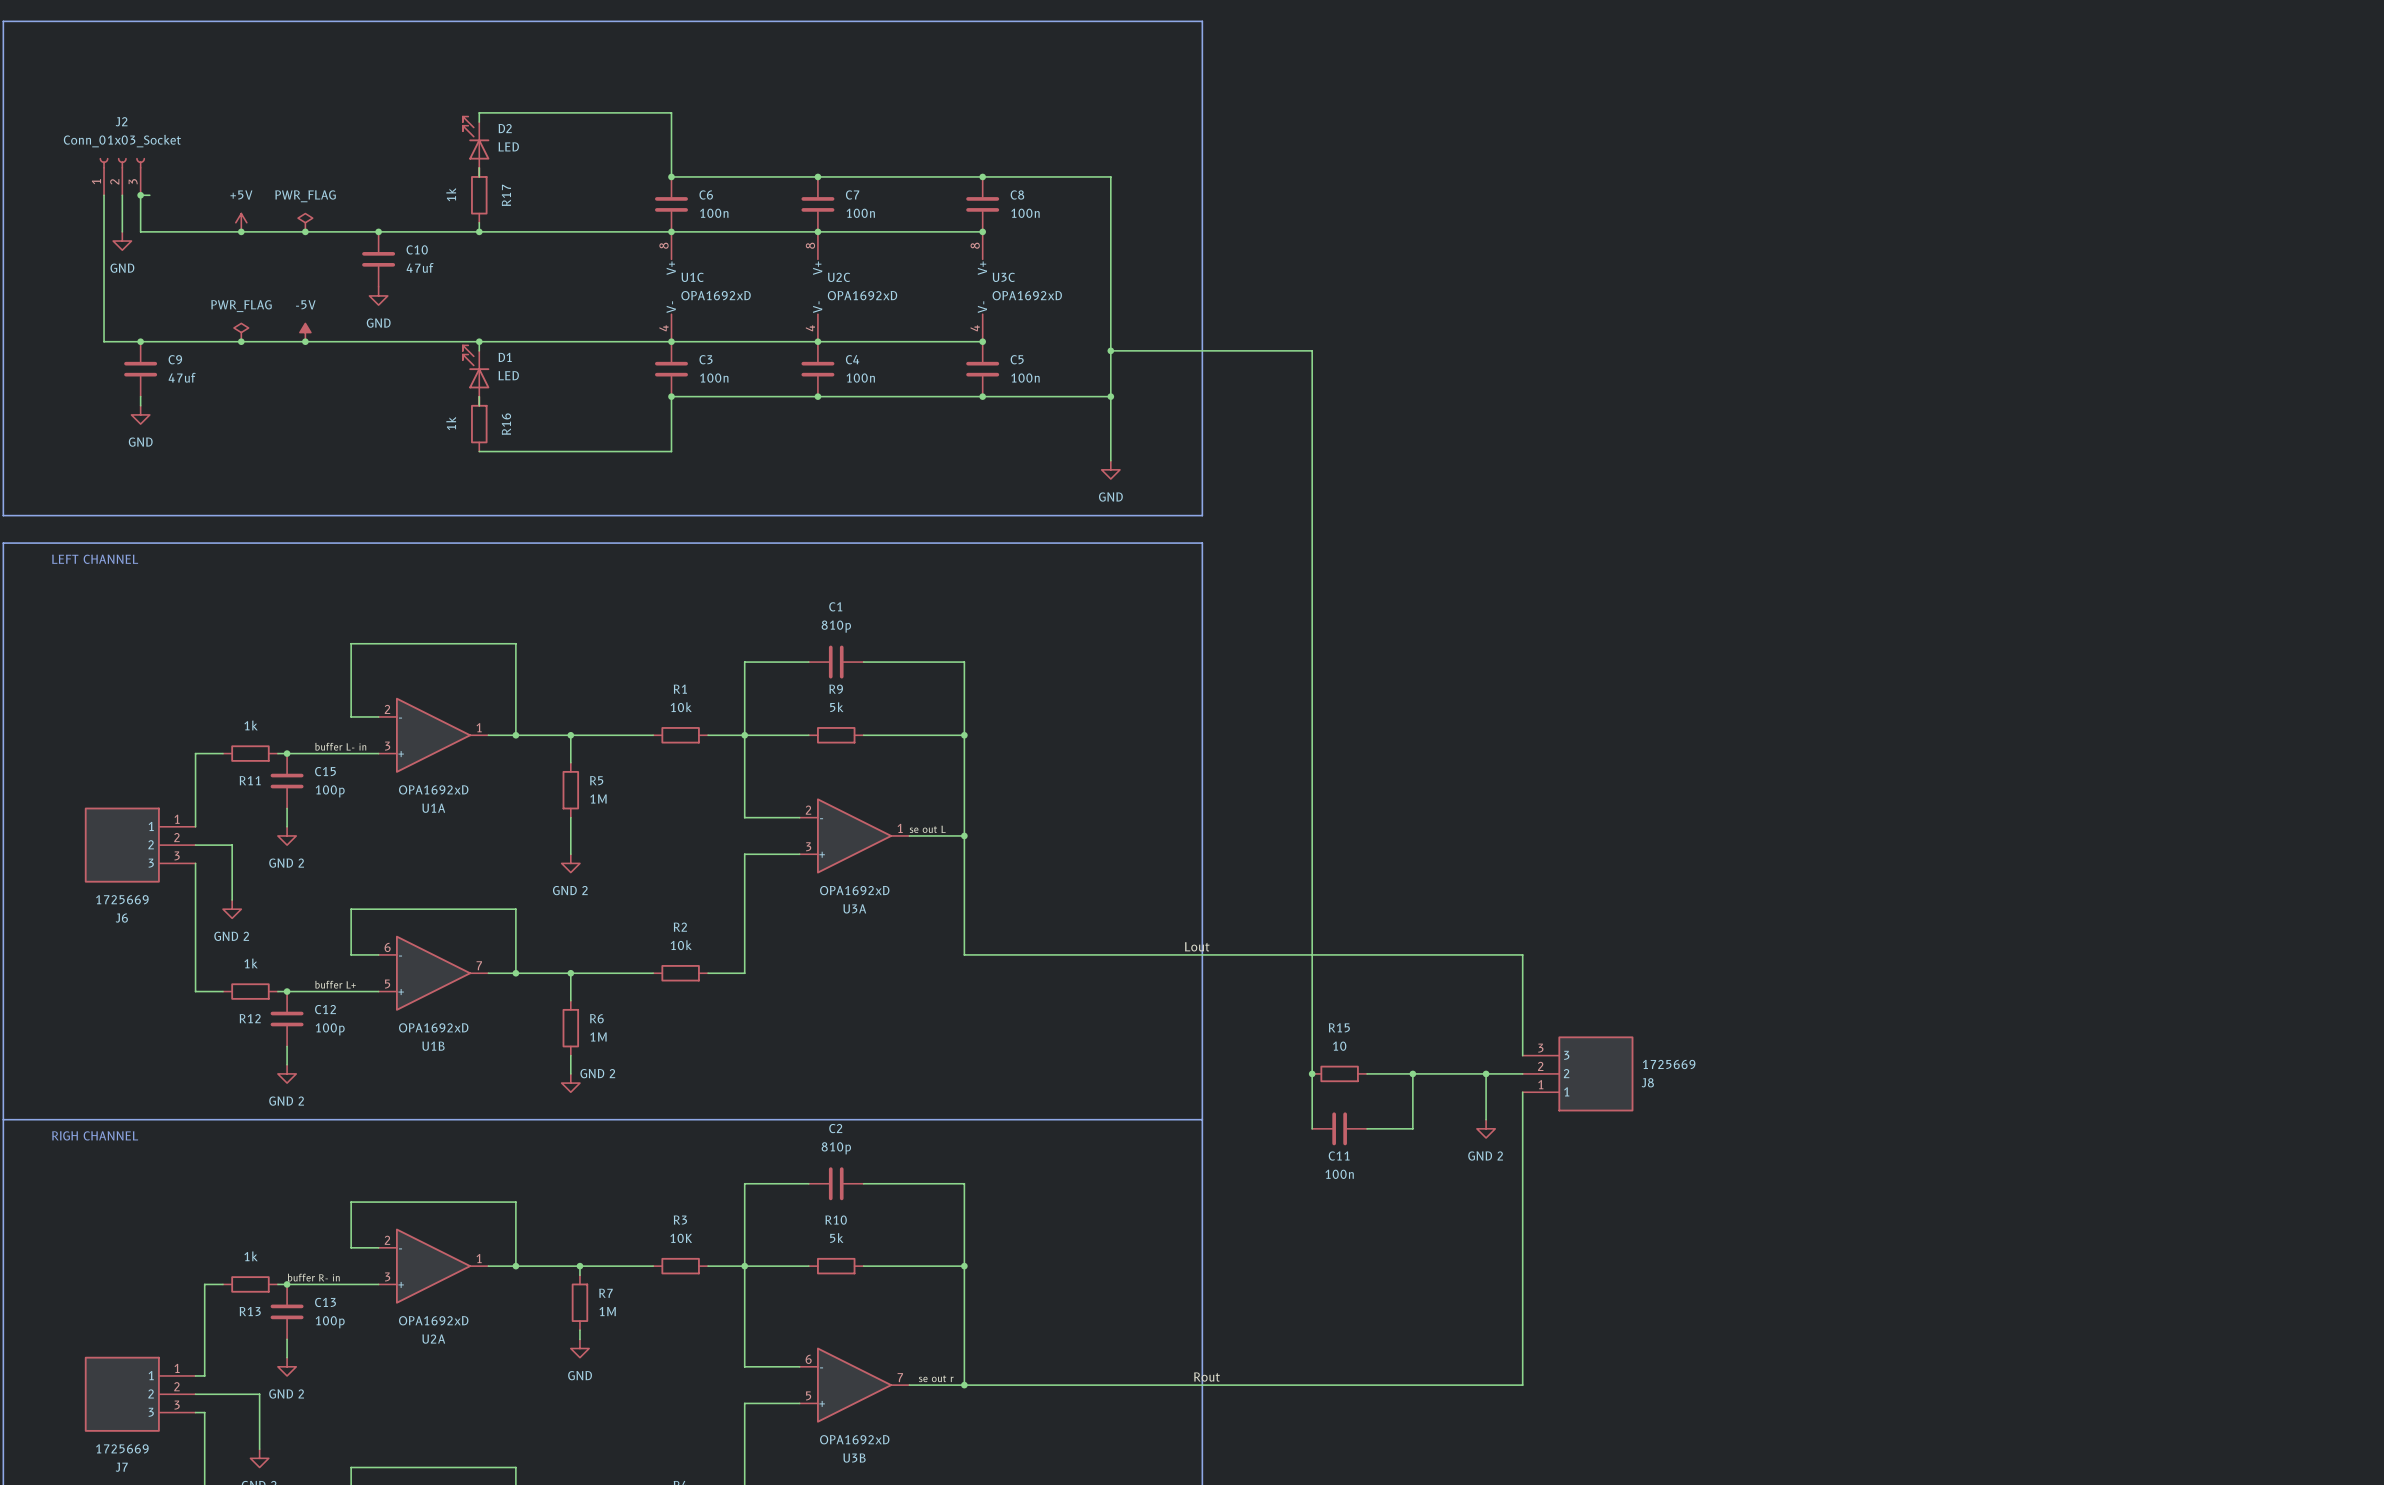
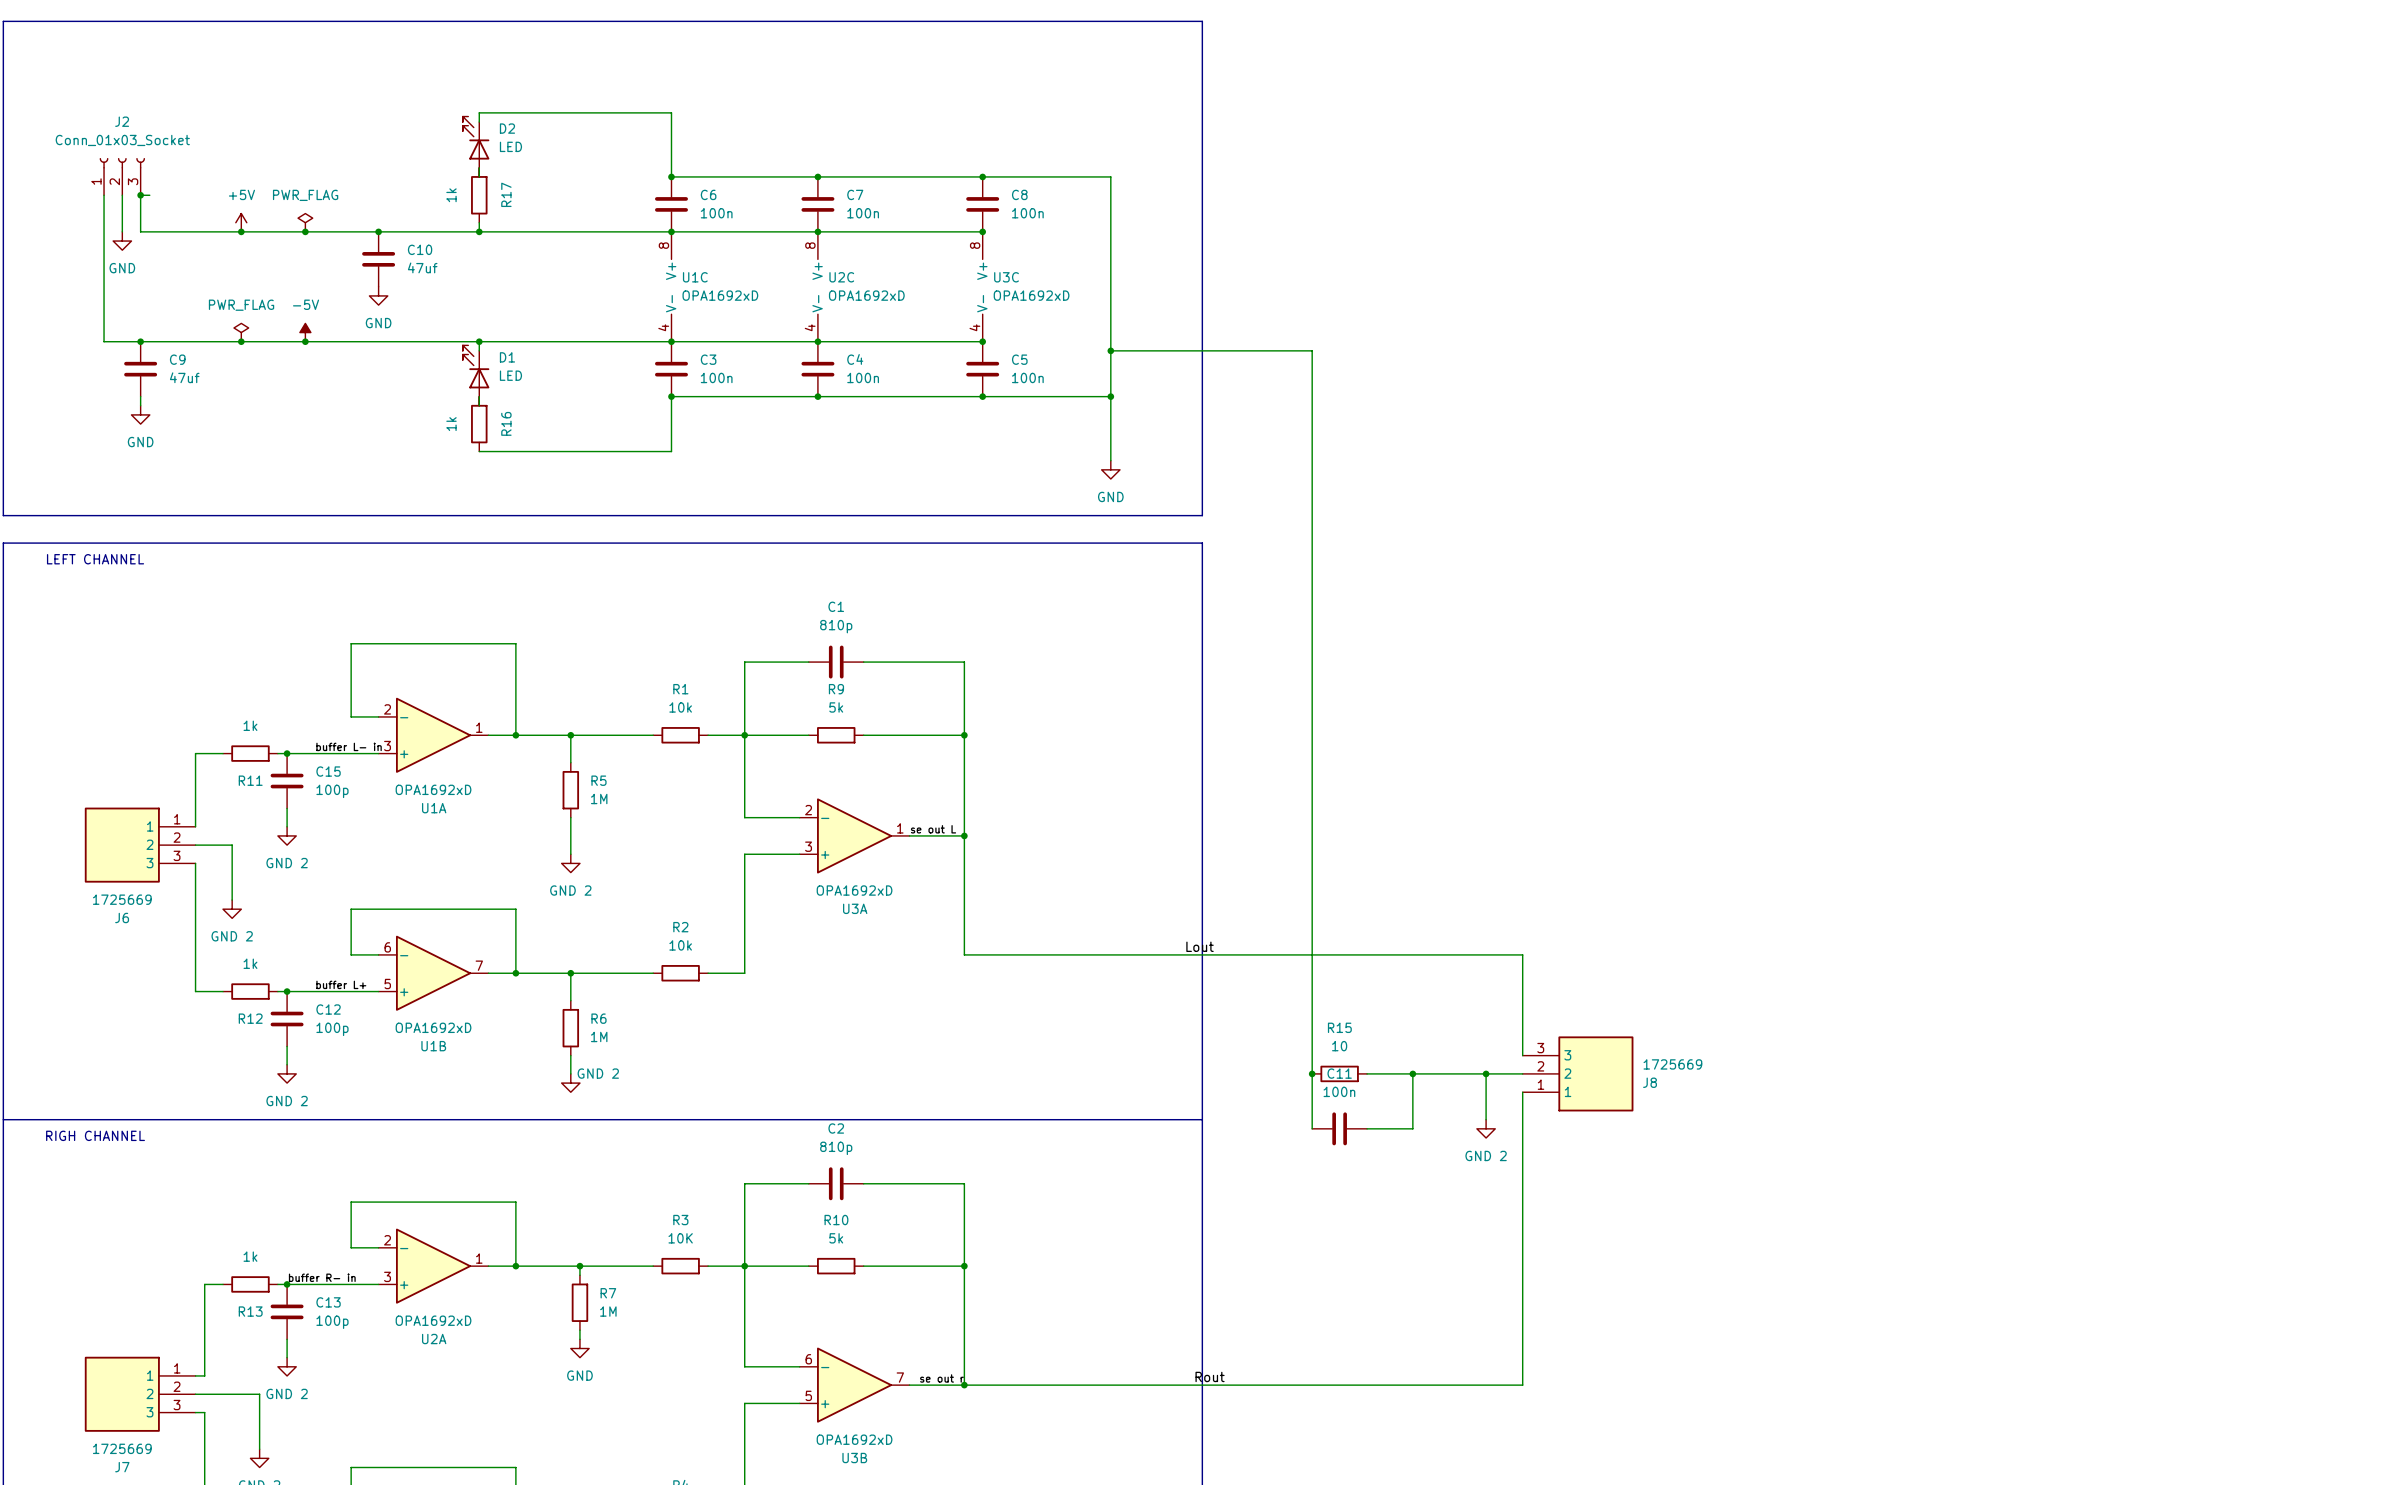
C11 name position: C11 (1339, 1156) -> C11 (1339, 1073)
C11 value position: 100n (1339, 1174) -> 100n (1339, 1091)

